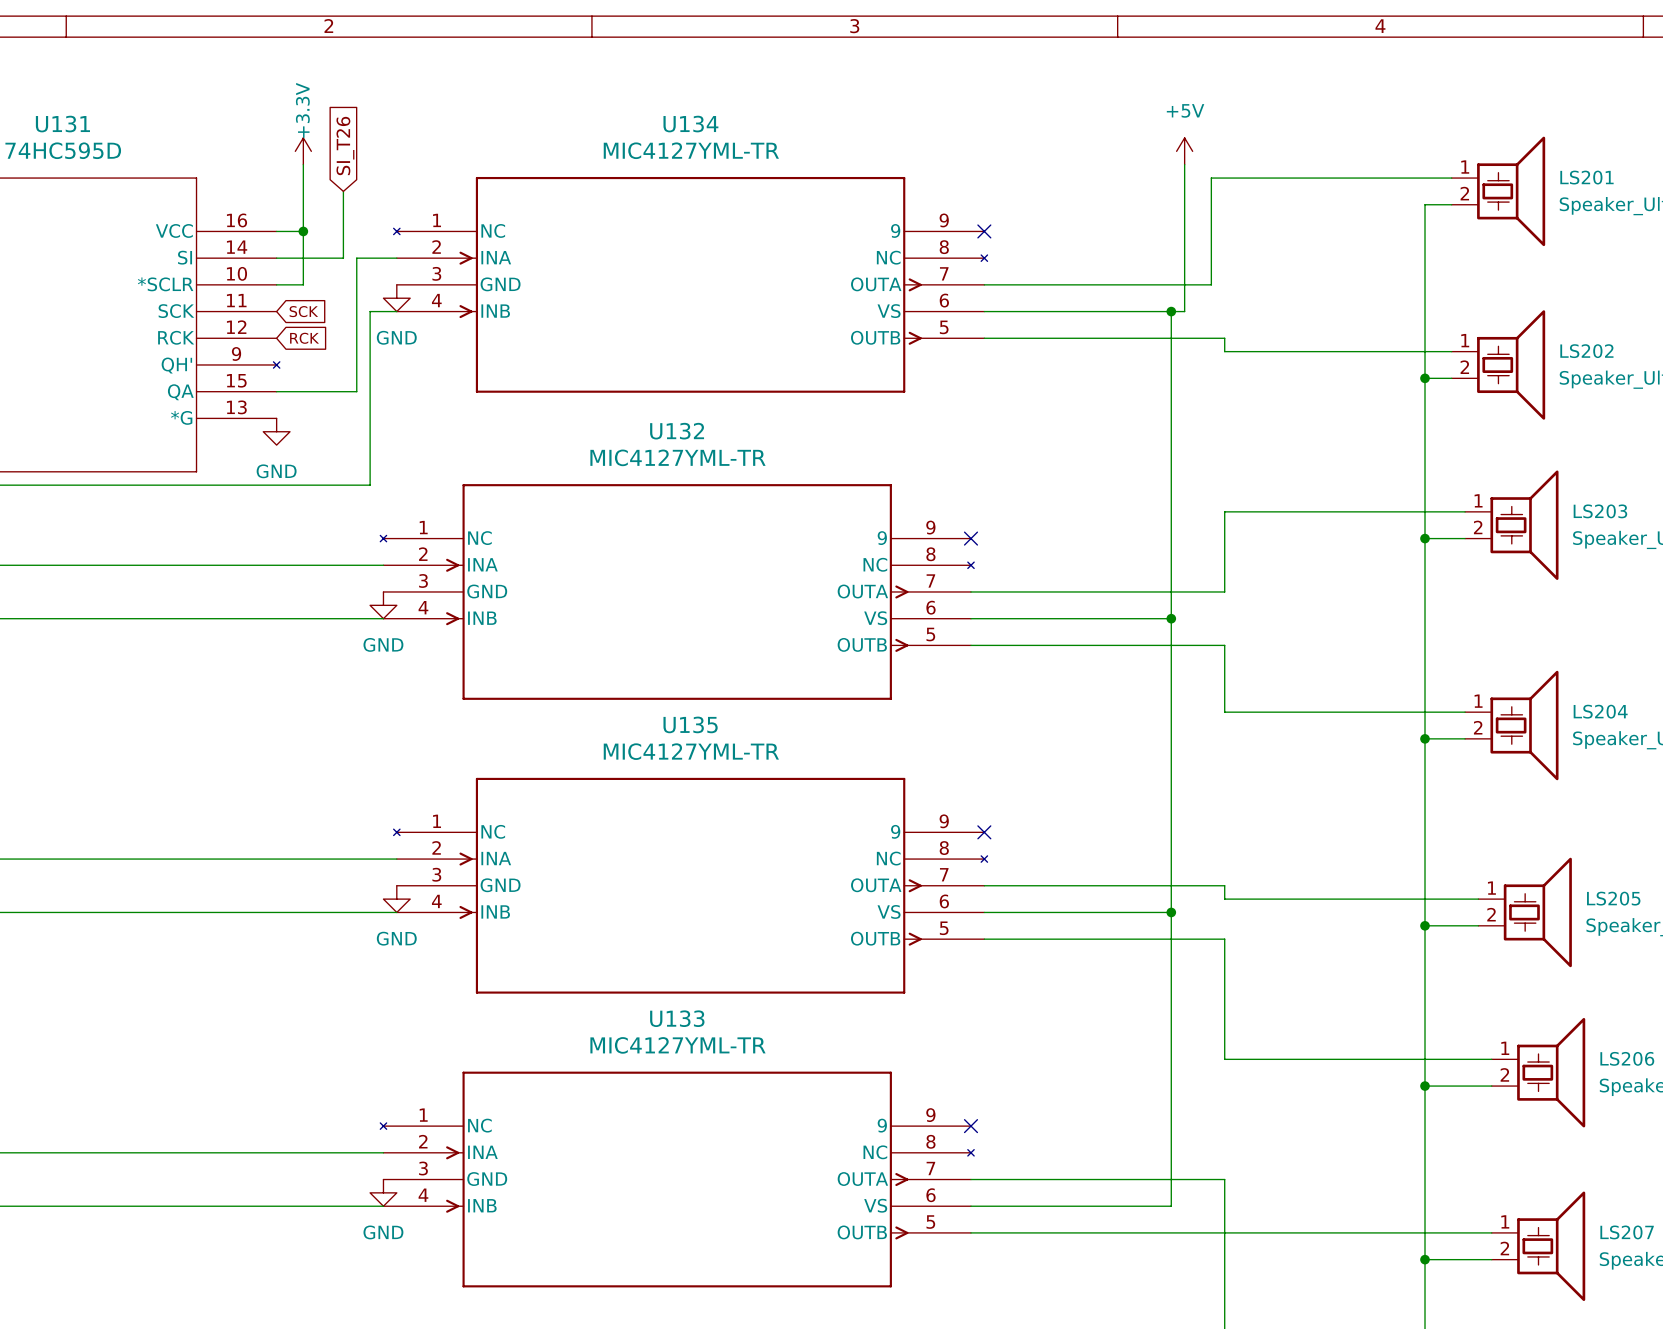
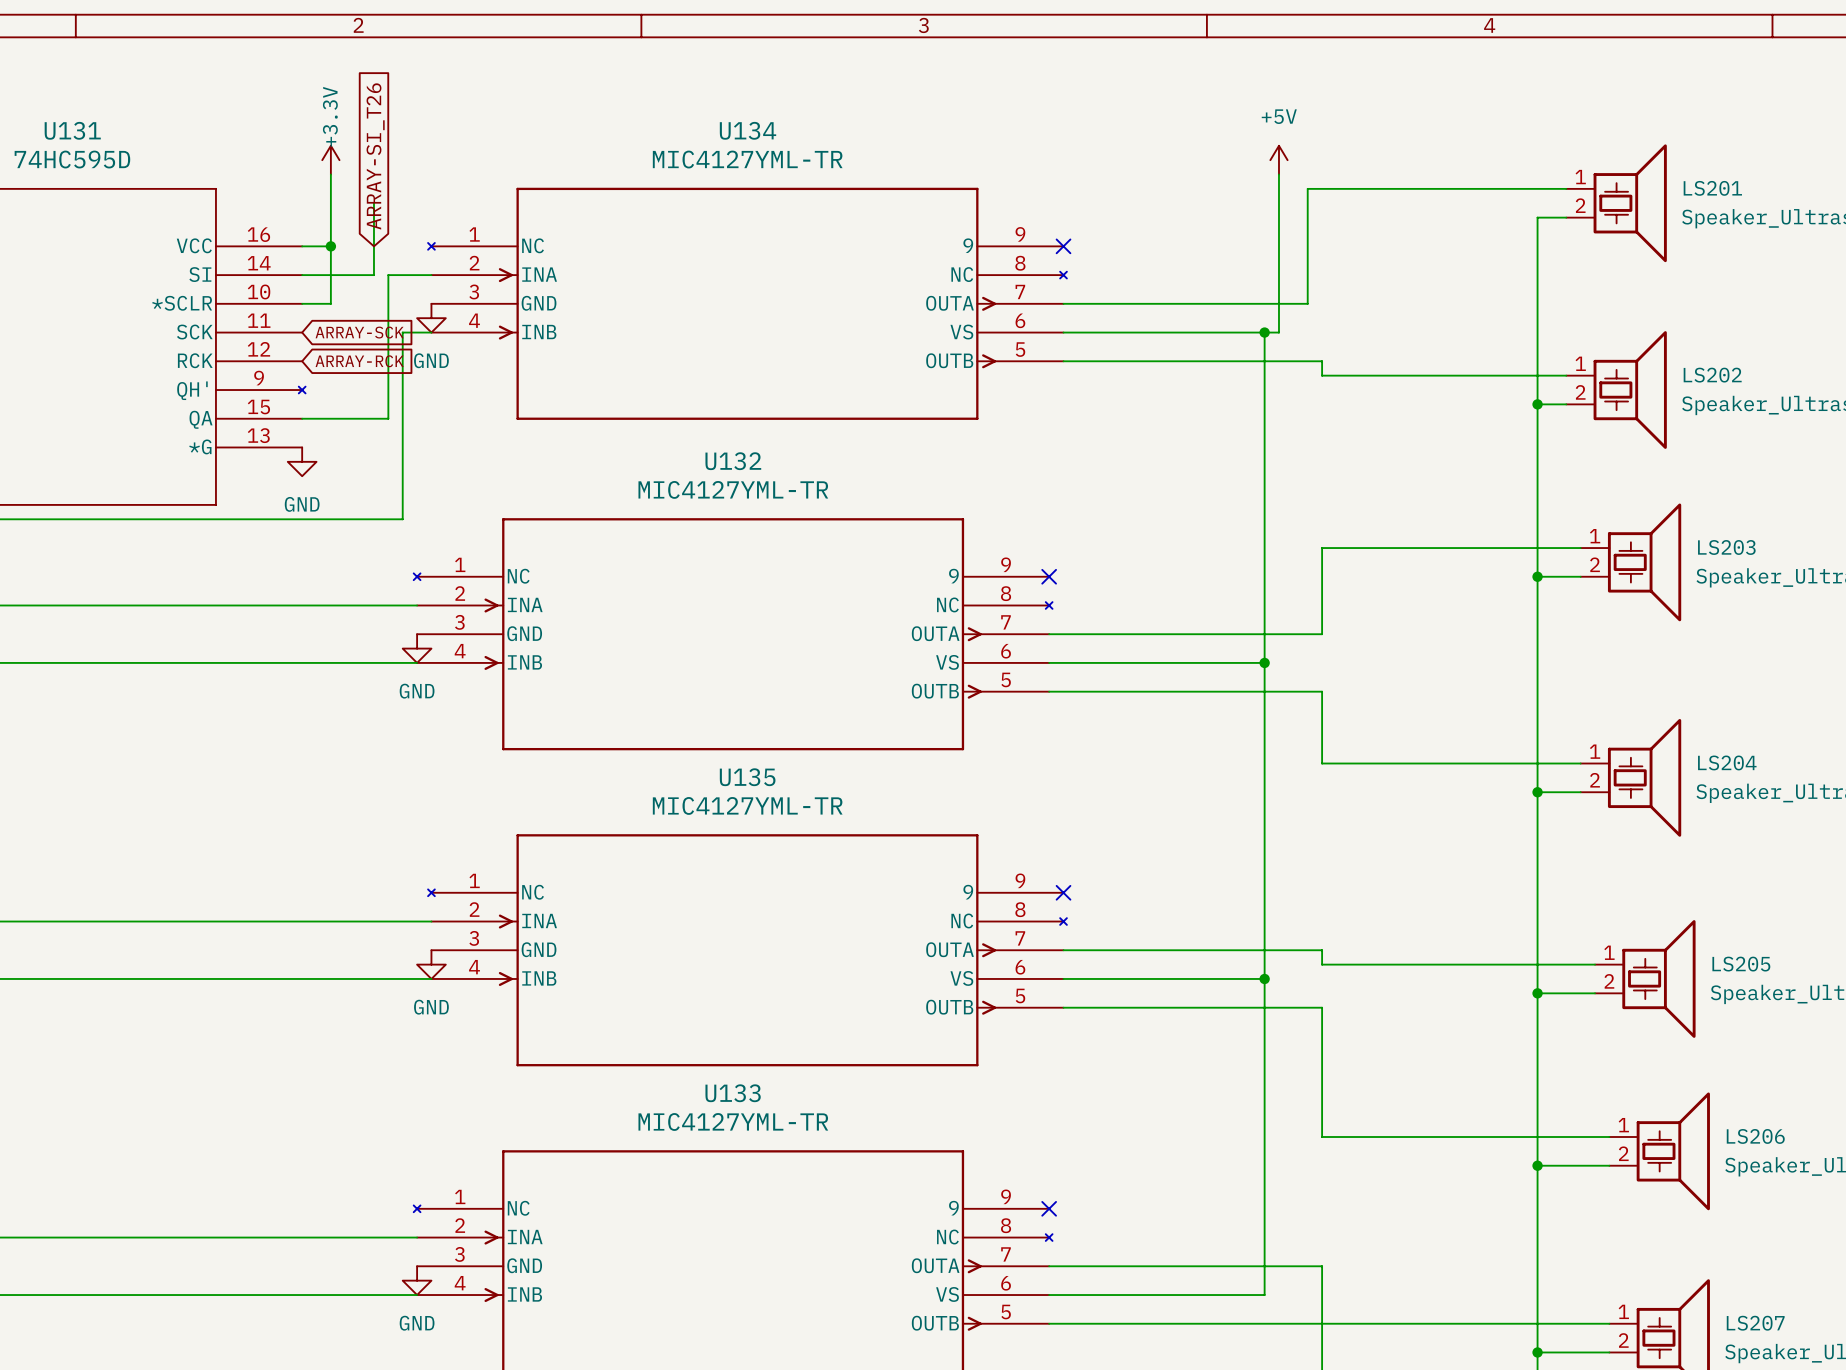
global label: SI_T26 (345, 146) -> ARRAY-SI_T26 (375, 156)
global label: SCK (303, 311) -> ARRAY-SCK (359, 332)
global label: RCK (304, 338) -> ARRAY-RCK (359, 361)

